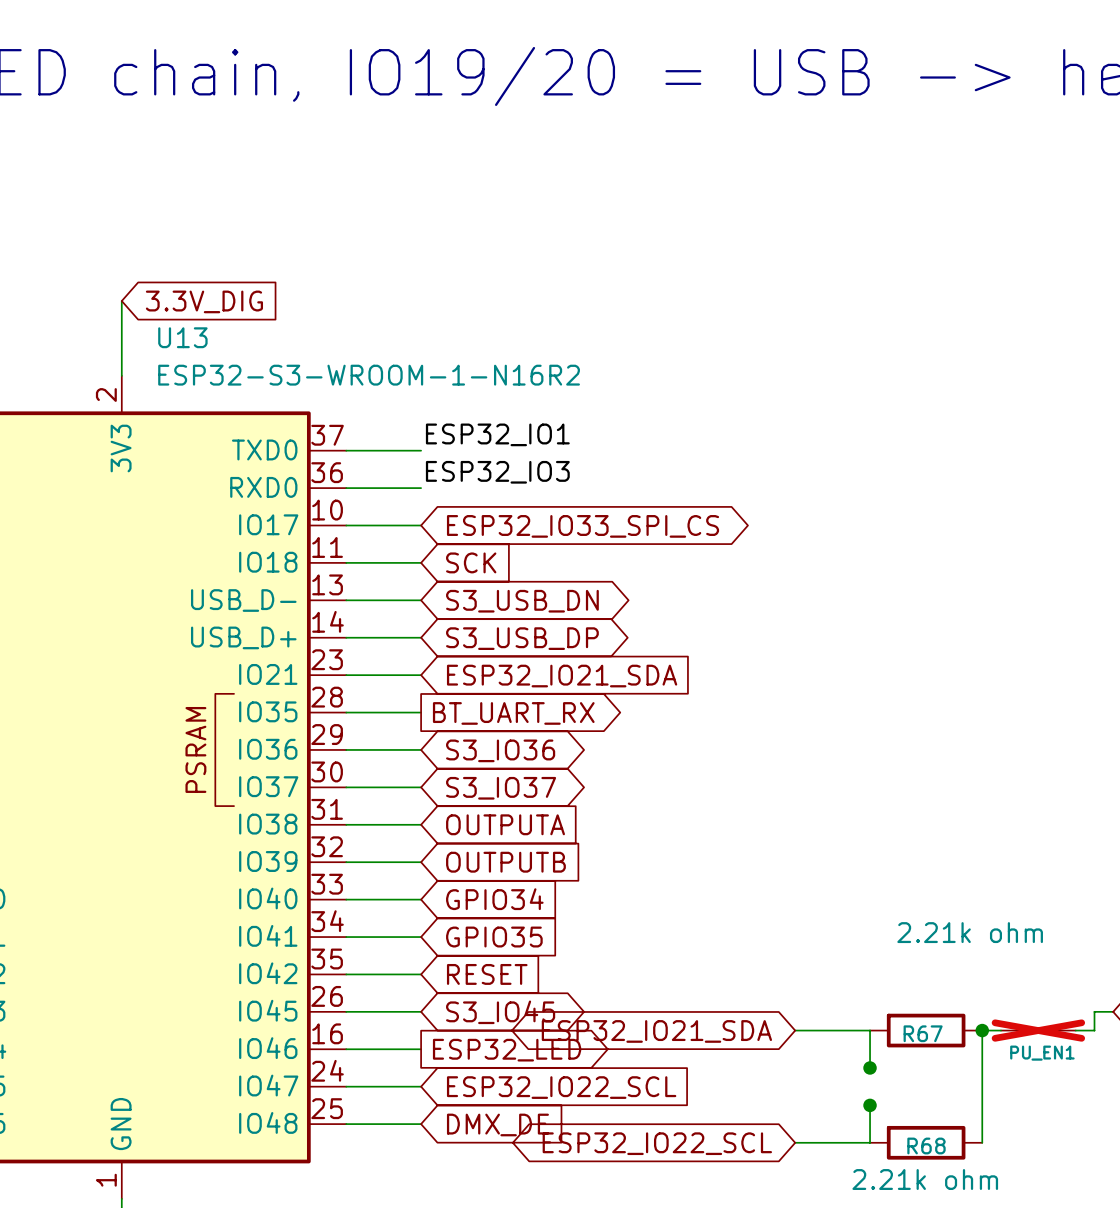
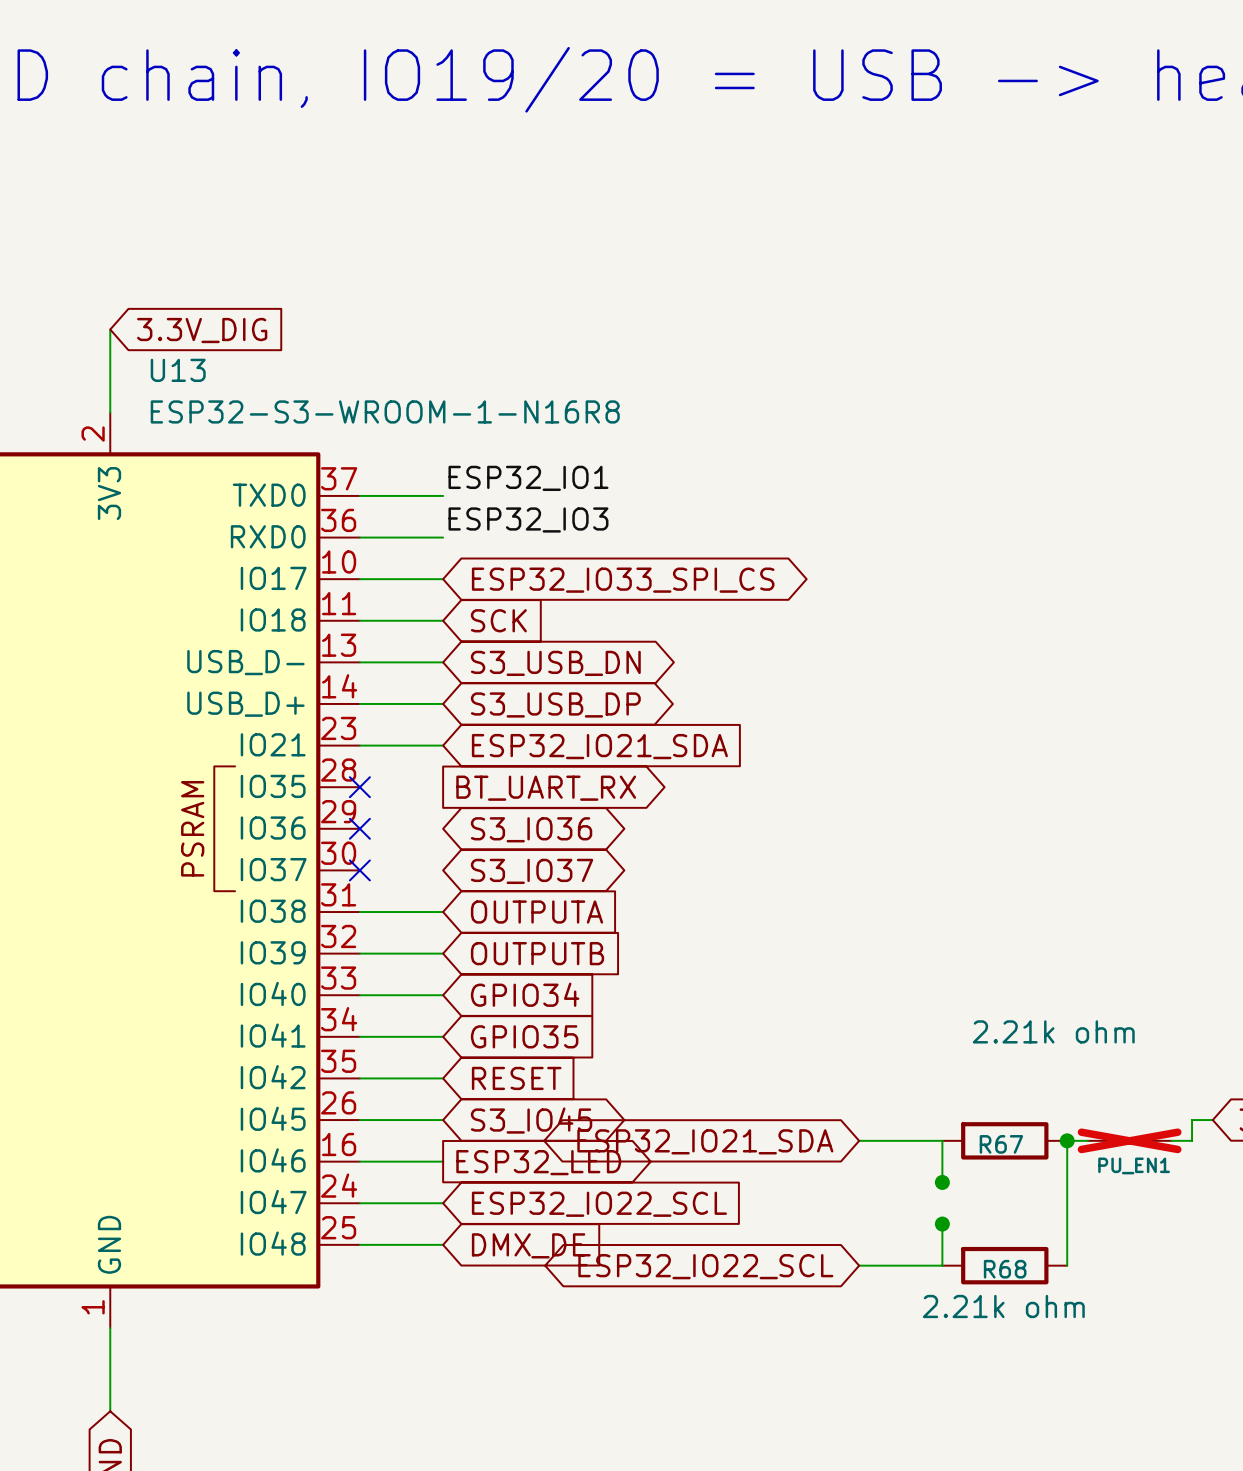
U13 value: ESP32-S3-WROOM-1-N16R2 (369, 375) -> ESP32-S3-WROOM-1-N16R8 (385, 411)
wire: (346, 712) (421, 712) -> none
no-connect mark: none -> (359, 787)
wire: (346, 749) (421, 749) -> none
no-connect mark: none -> (359, 828)
wire: (346, 787) (421, 787) -> none
no-connect mark: none -> (359, 870)

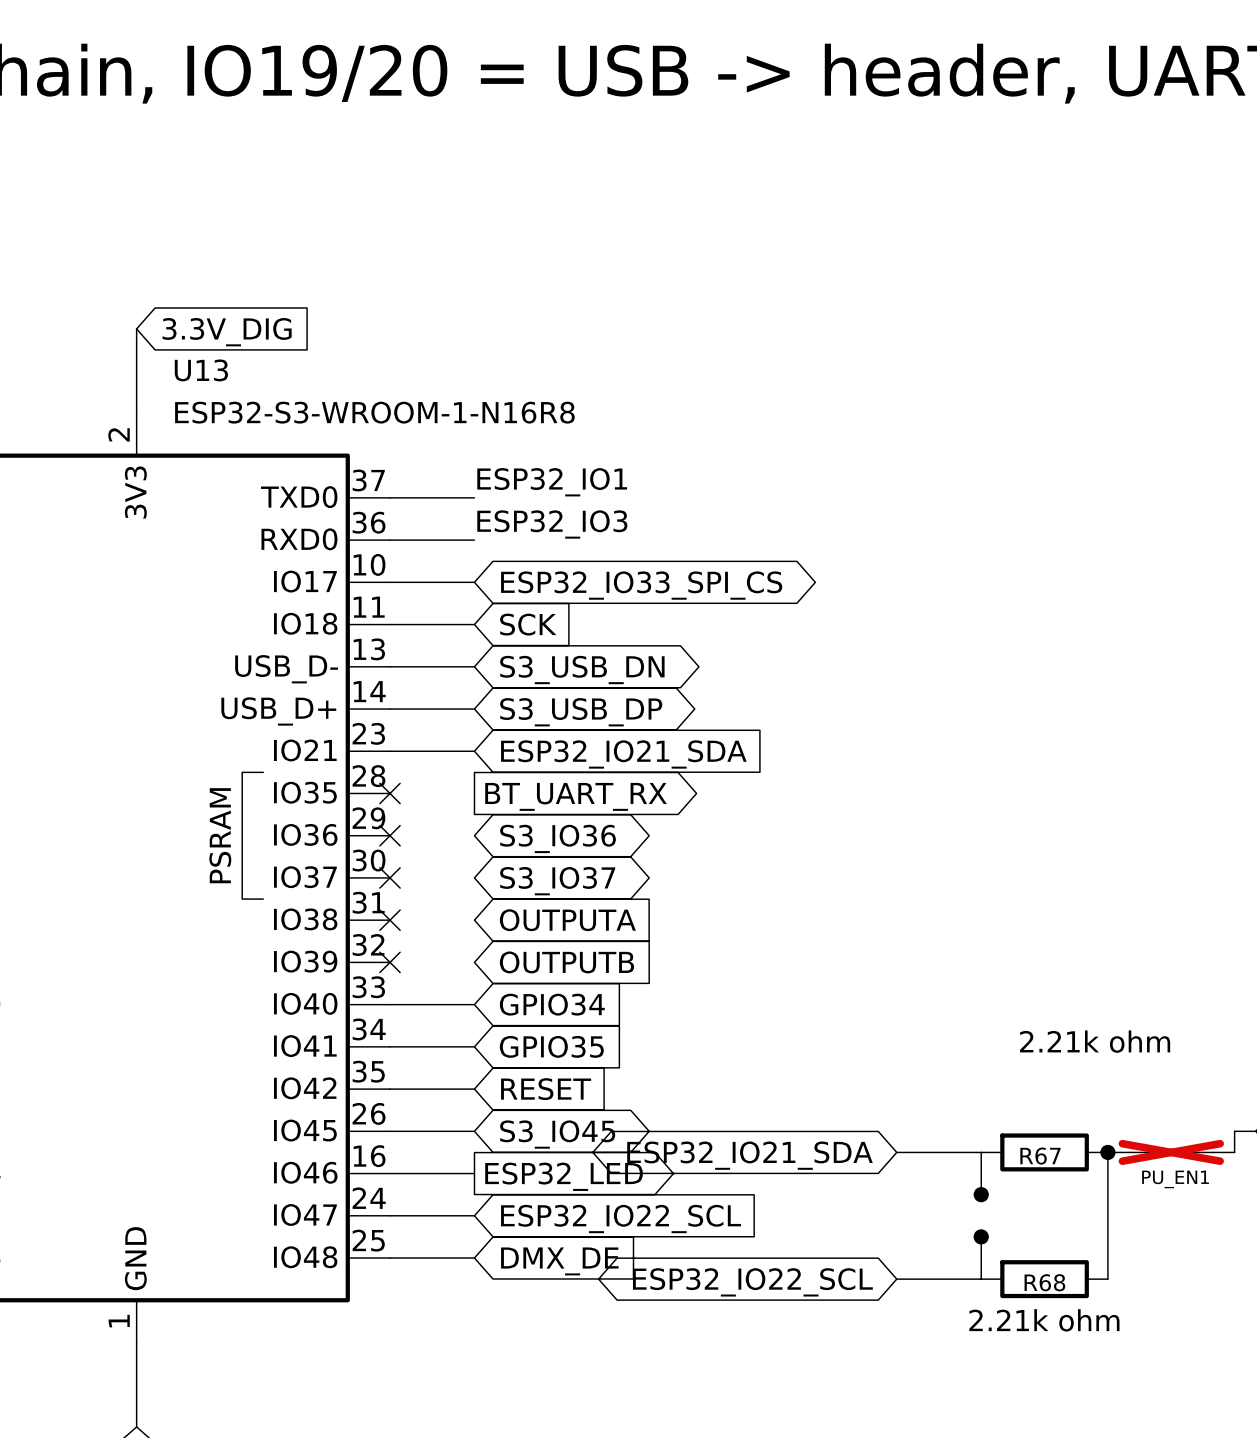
wire: (359, 912) (443, 912) -> none
no-connect mark: none -> (390, 920)
wire: (359, 953) (443, 953) -> none
no-connect mark: none -> (390, 962)

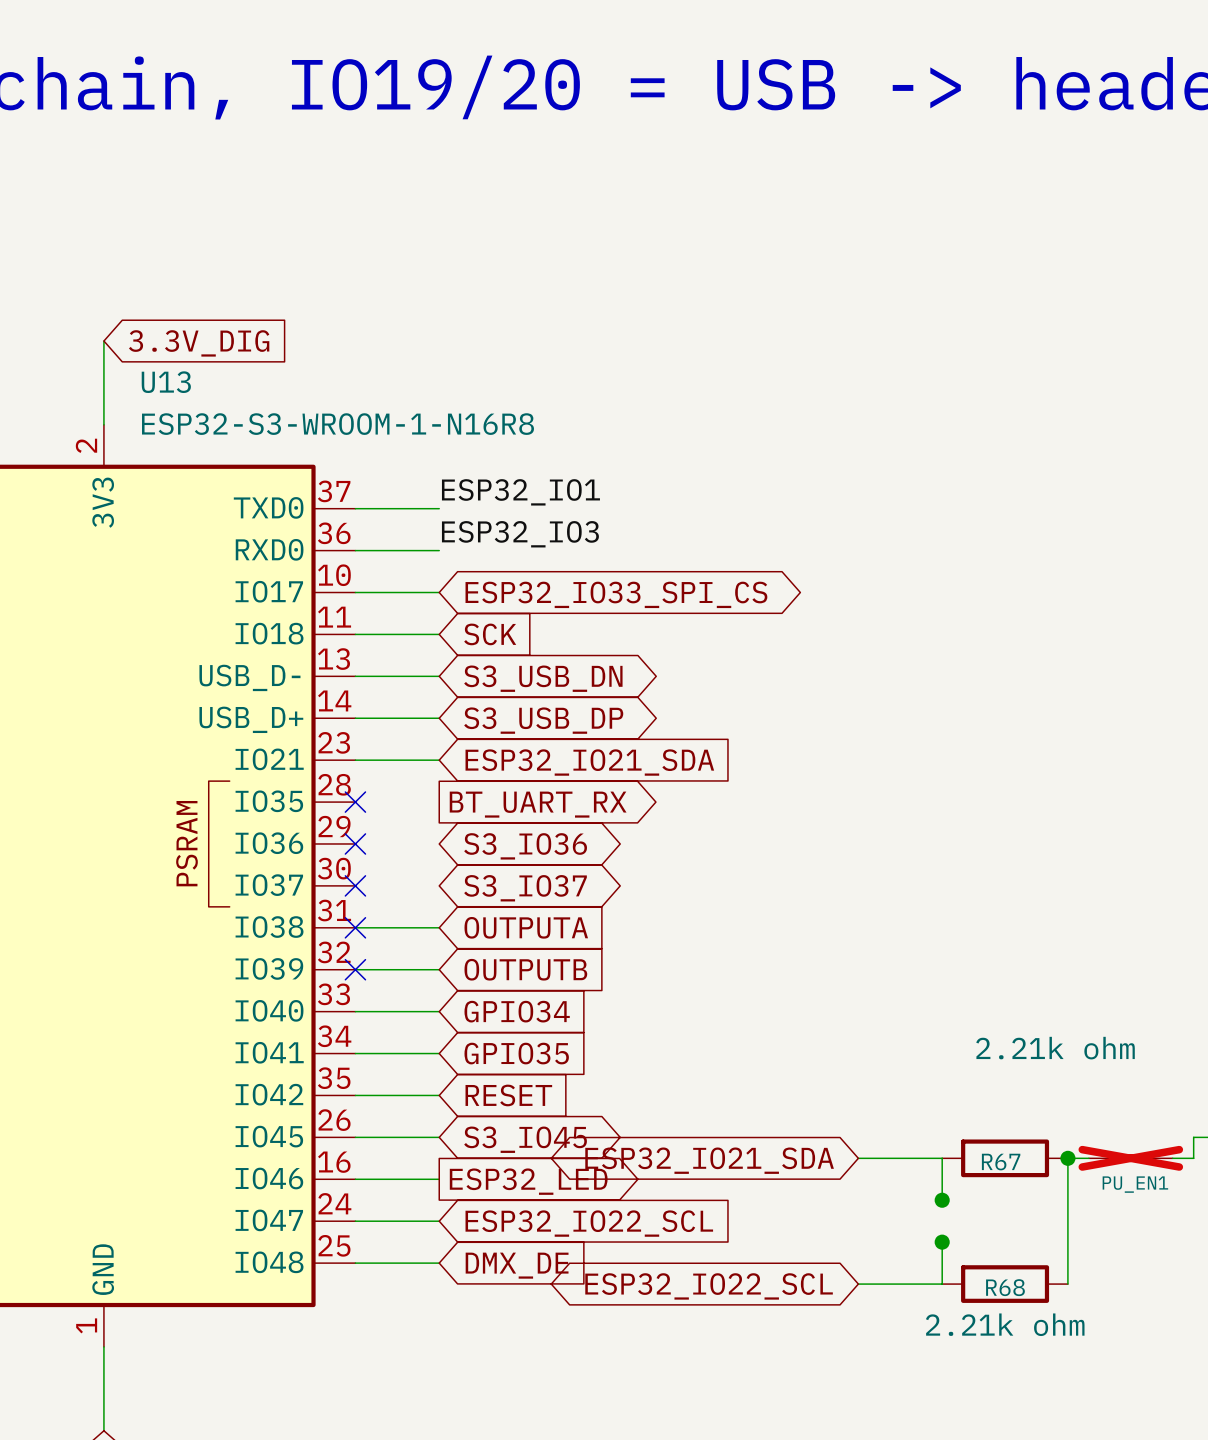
wire: none -> (355, 927) (439, 927)
wire: none -> (355, 969) (439, 969)

